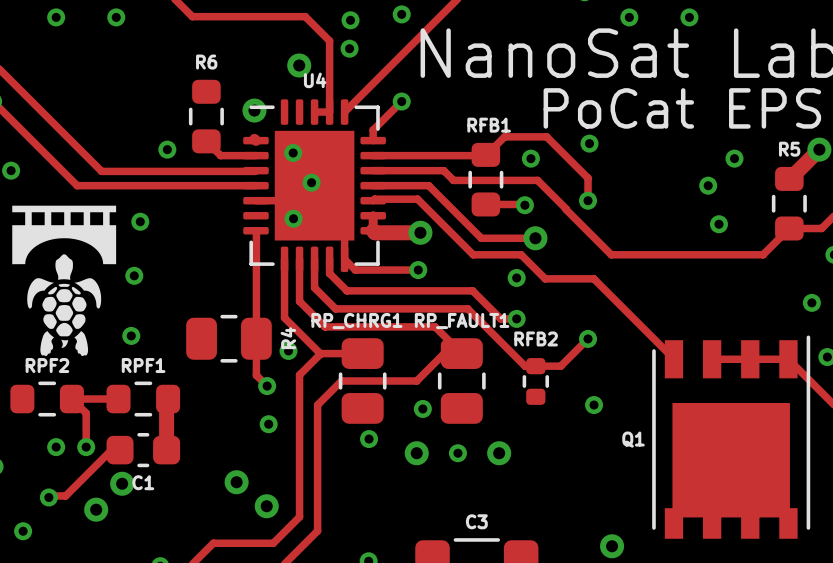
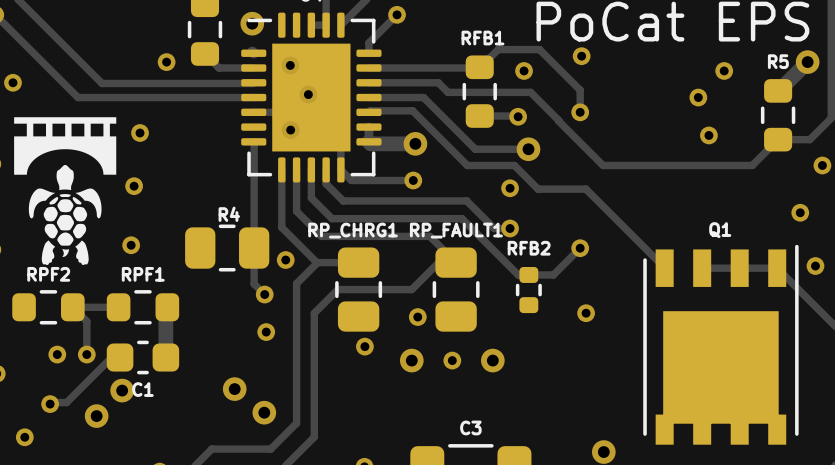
R4 name rotation: 0° (288, 338) -> 90° clockwise (229, 214)
R4 name position: R4 (288, 338) -> R4 (229, 214)
Q1 name position: Q1 (633, 439) -> Q1 (720, 230)

